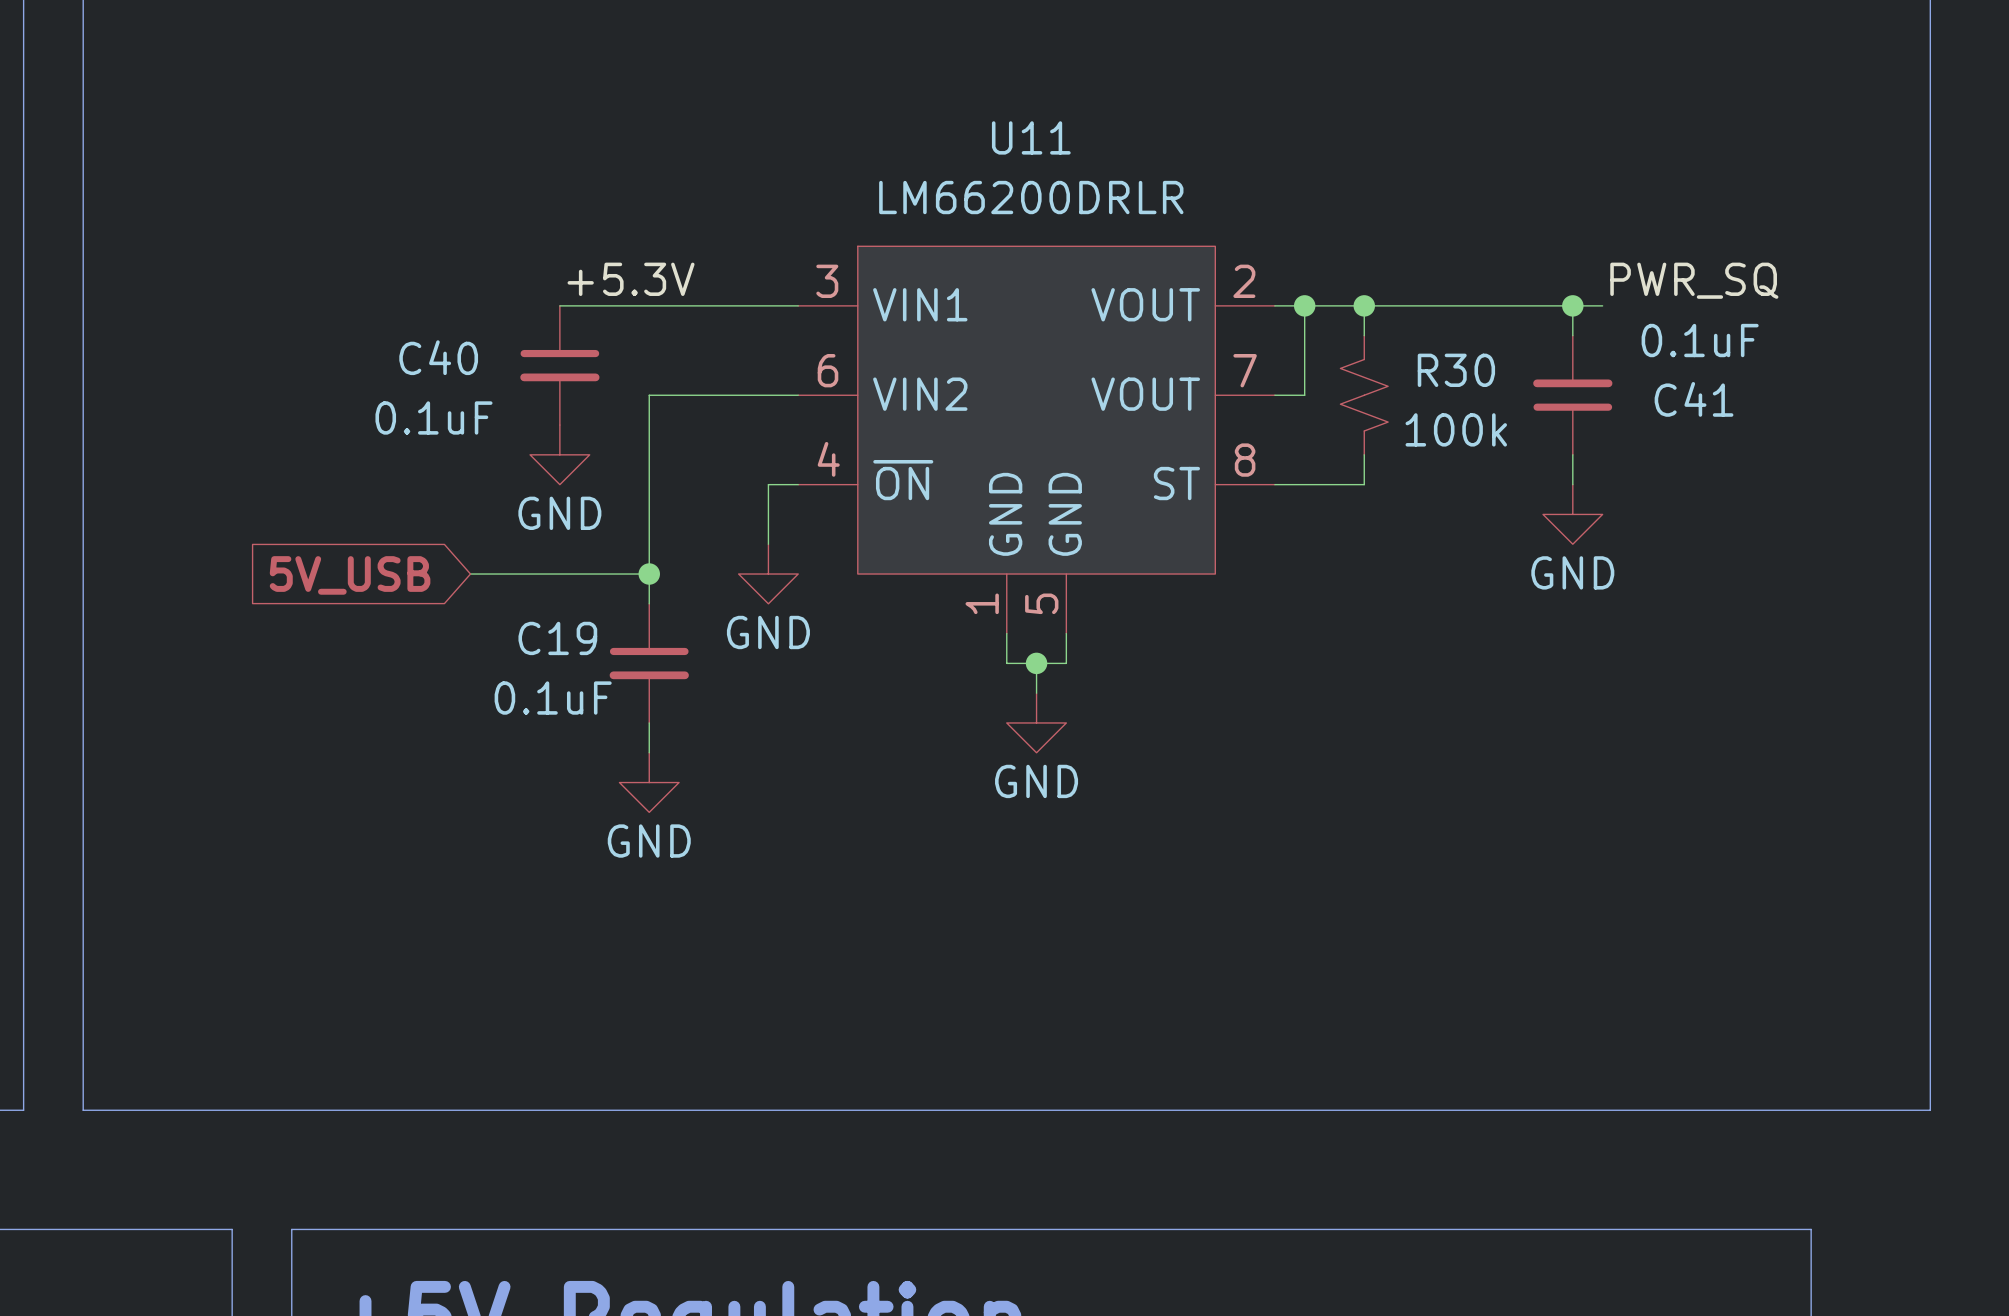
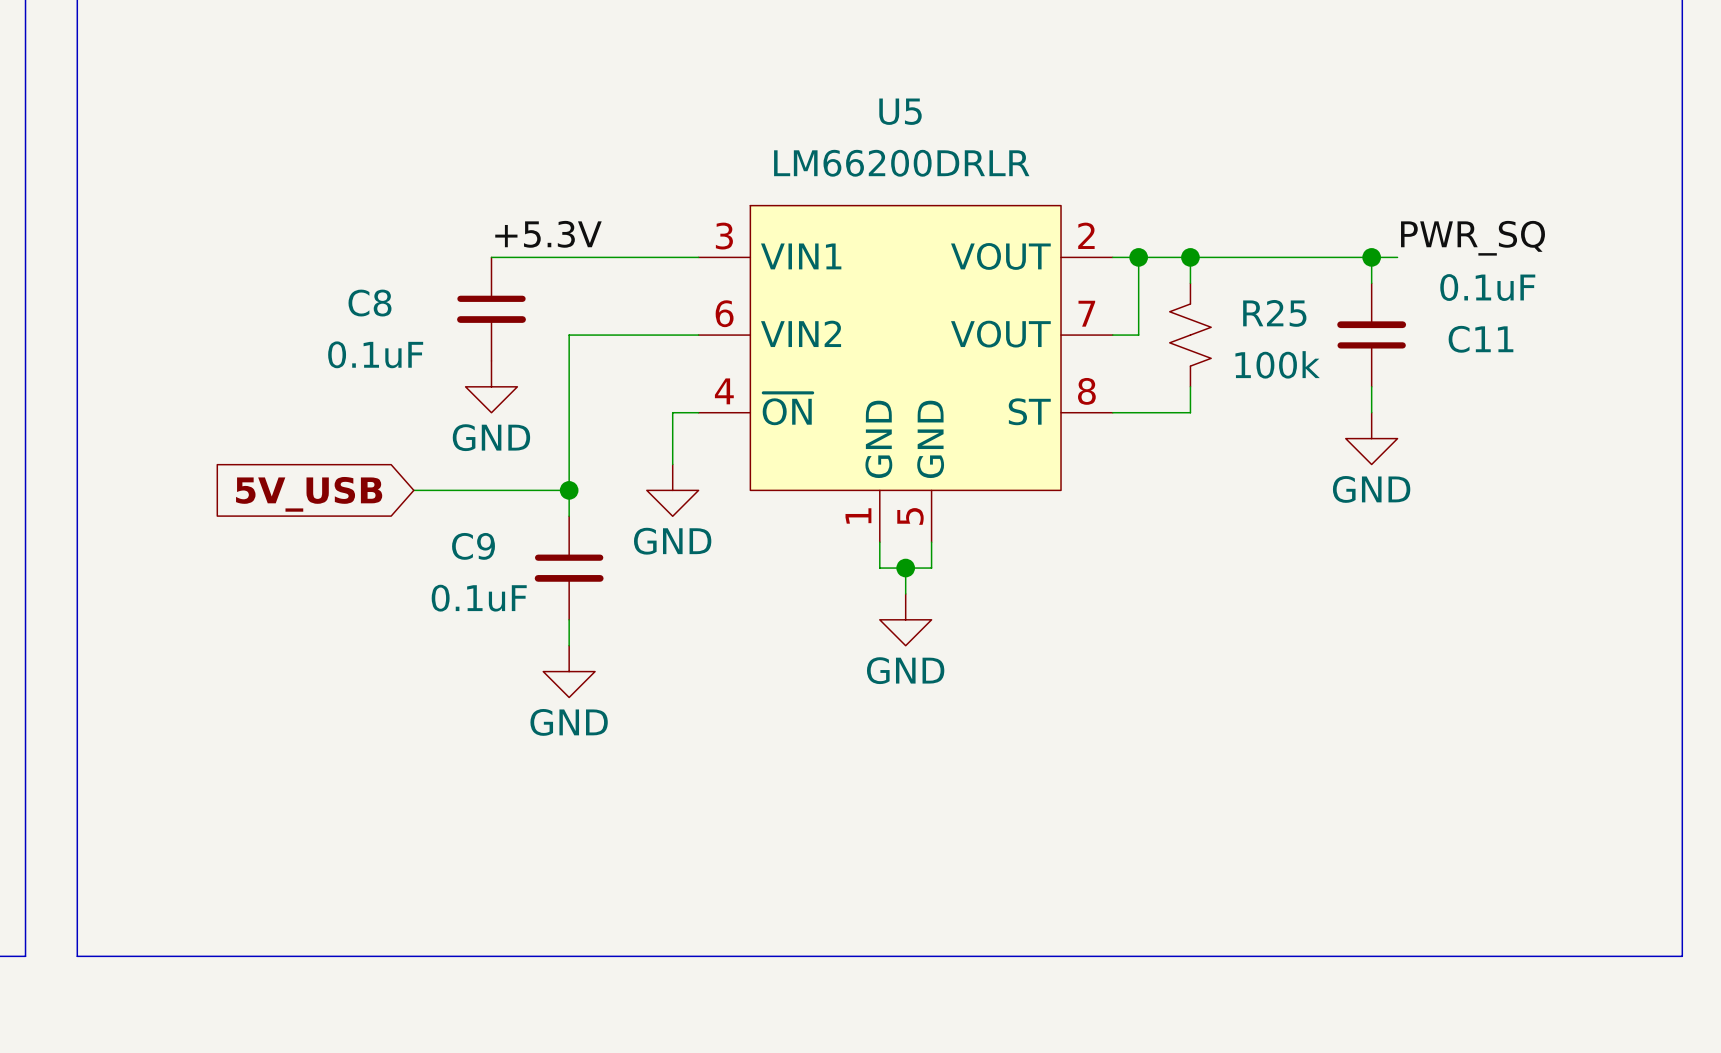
U11 name: U11 (1031, 137) -> U5 (900, 111)
C40 name: C40 (438, 357) -> C8 (370, 303)
R30 name: R30 (1456, 370) -> R25 (1274, 313)
C41 name: C41 (1694, 399) -> C11 (1480, 339)
C19 name: C19 (557, 638) -> C9 (473, 546)

